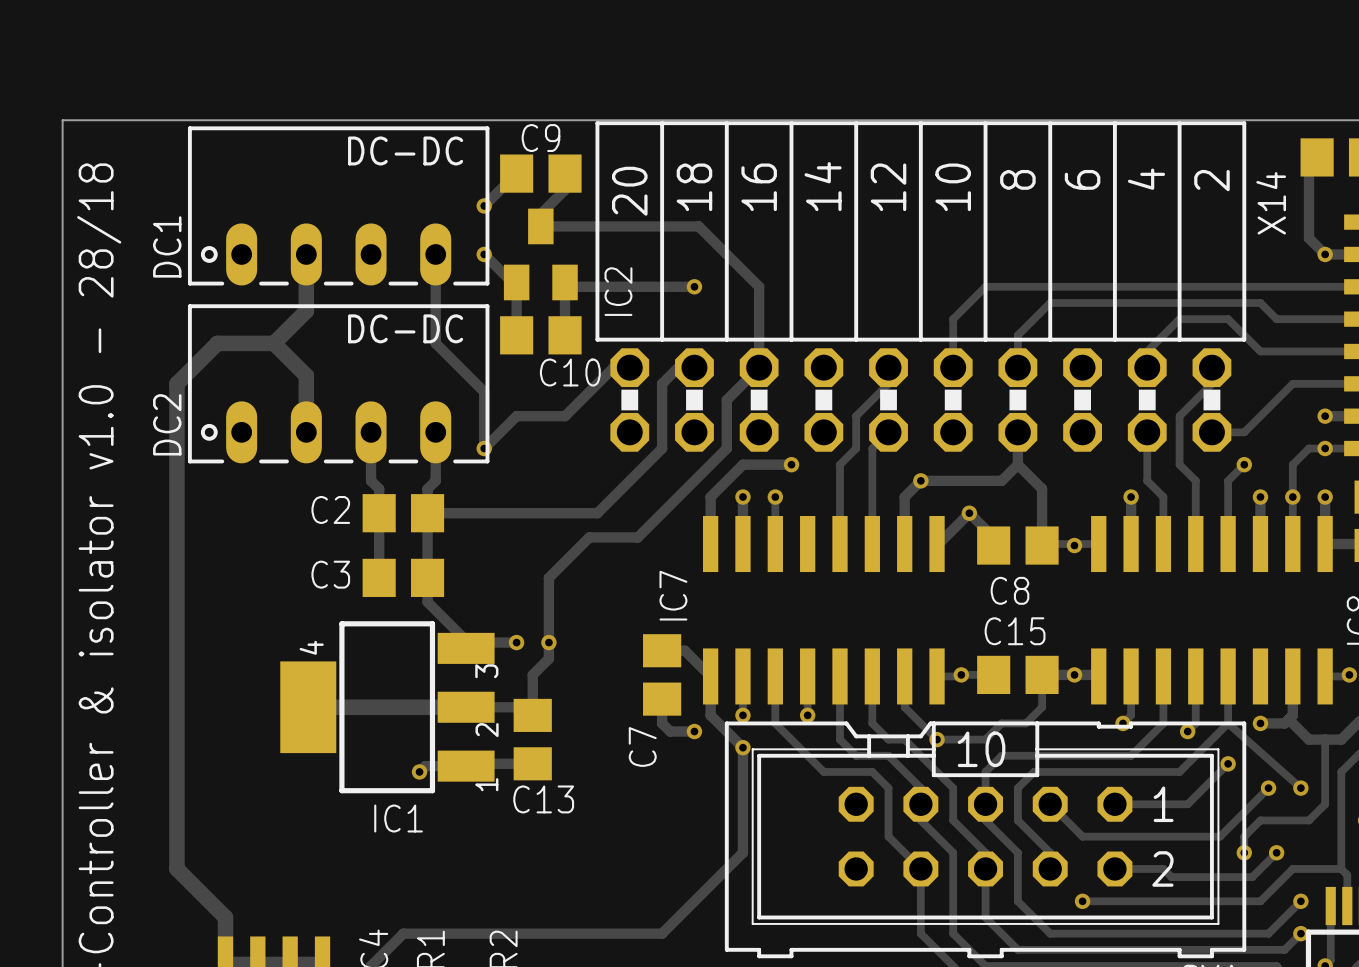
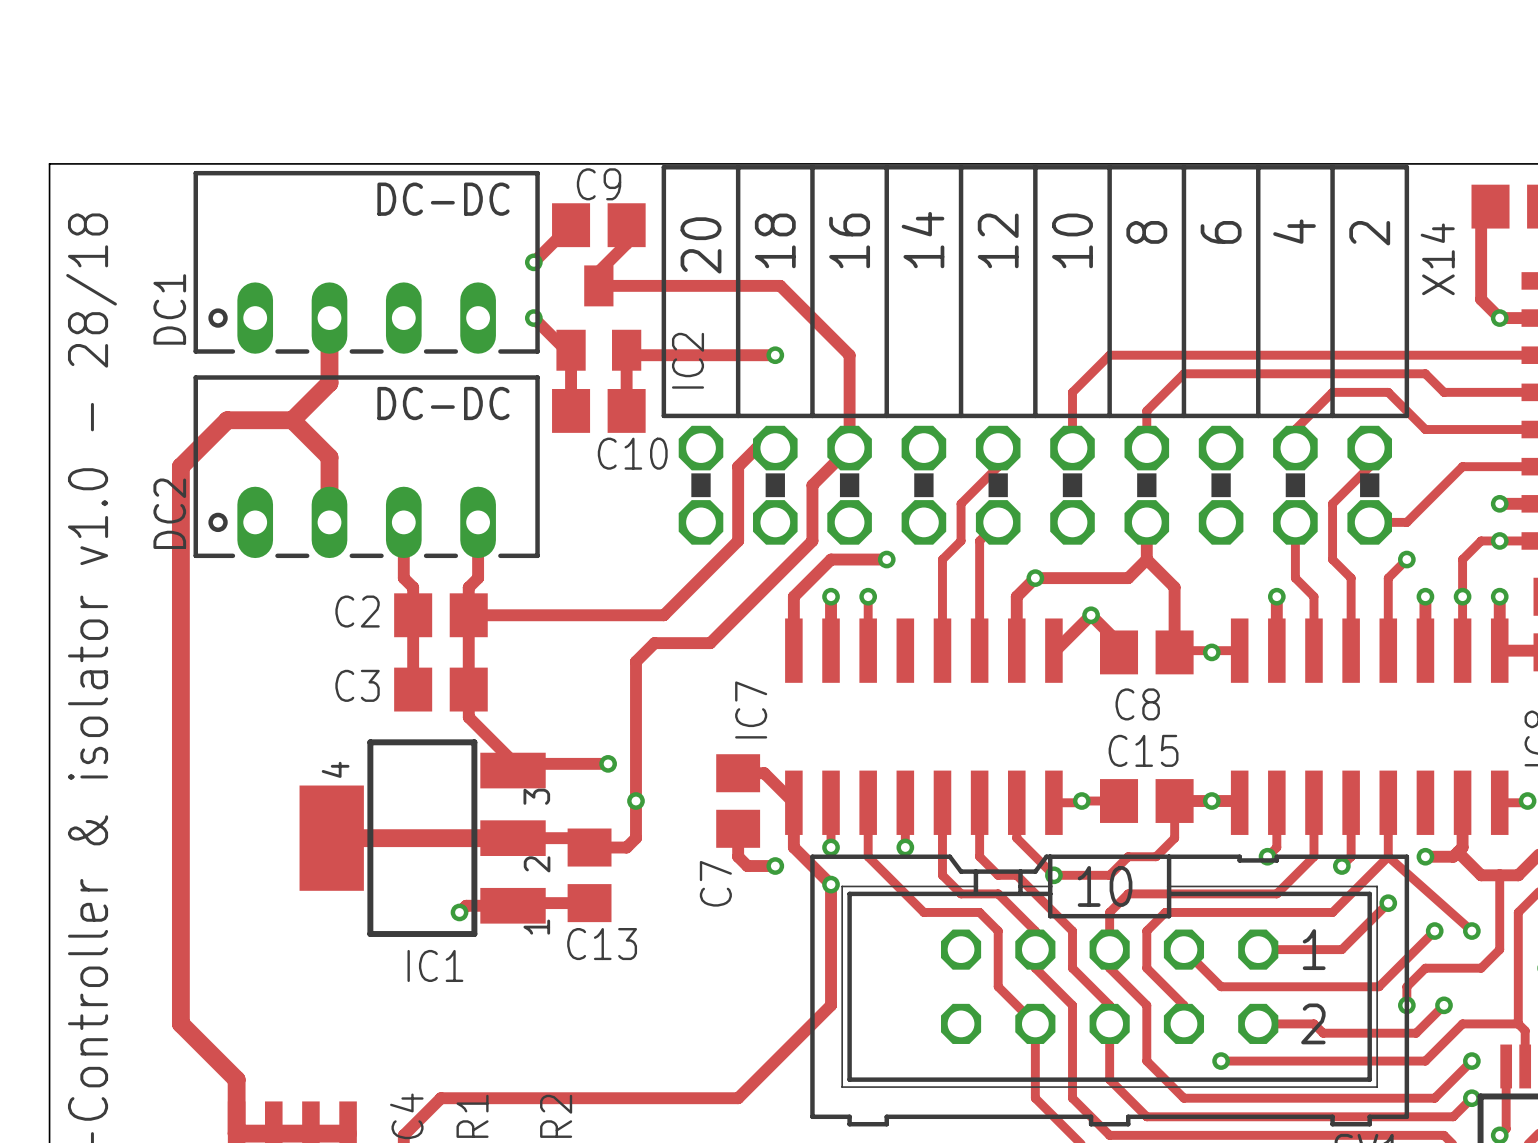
track: (435, 254) (435, 343) (484, 391) (484, 448) (516, 416) (565, 416) (613, 367) (629, 367) -> none
via: (484, 448) -> none
track: (573, 553) (548, 577) (548, 658) (532, 674) (532, 715) -> (635, 661) (635, 838) (626, 847) (589, 847)
track: none -> (570, 763) (608, 763)
via position: (516, 642) -> (635, 801)

